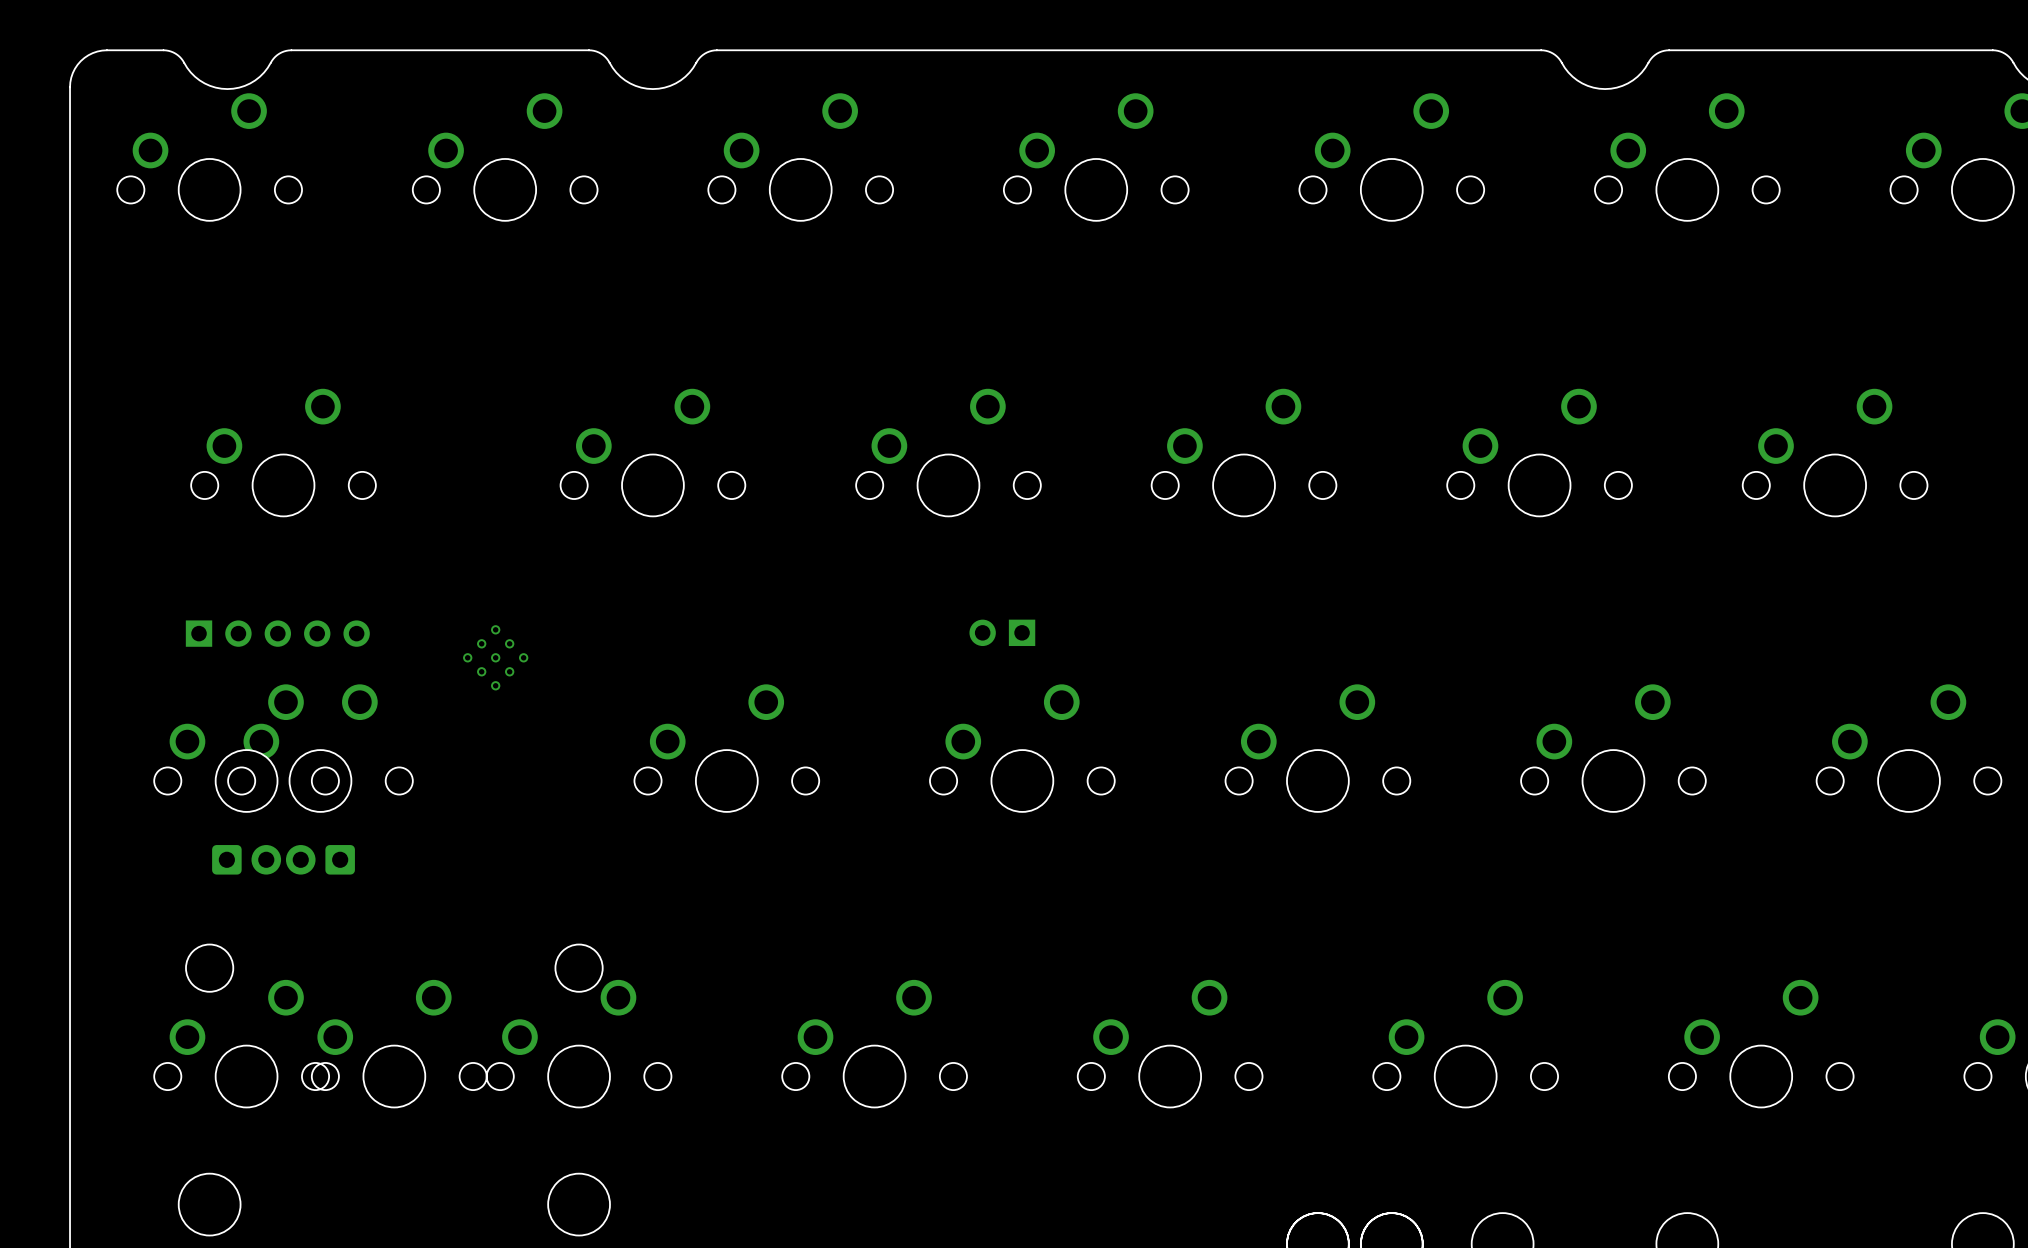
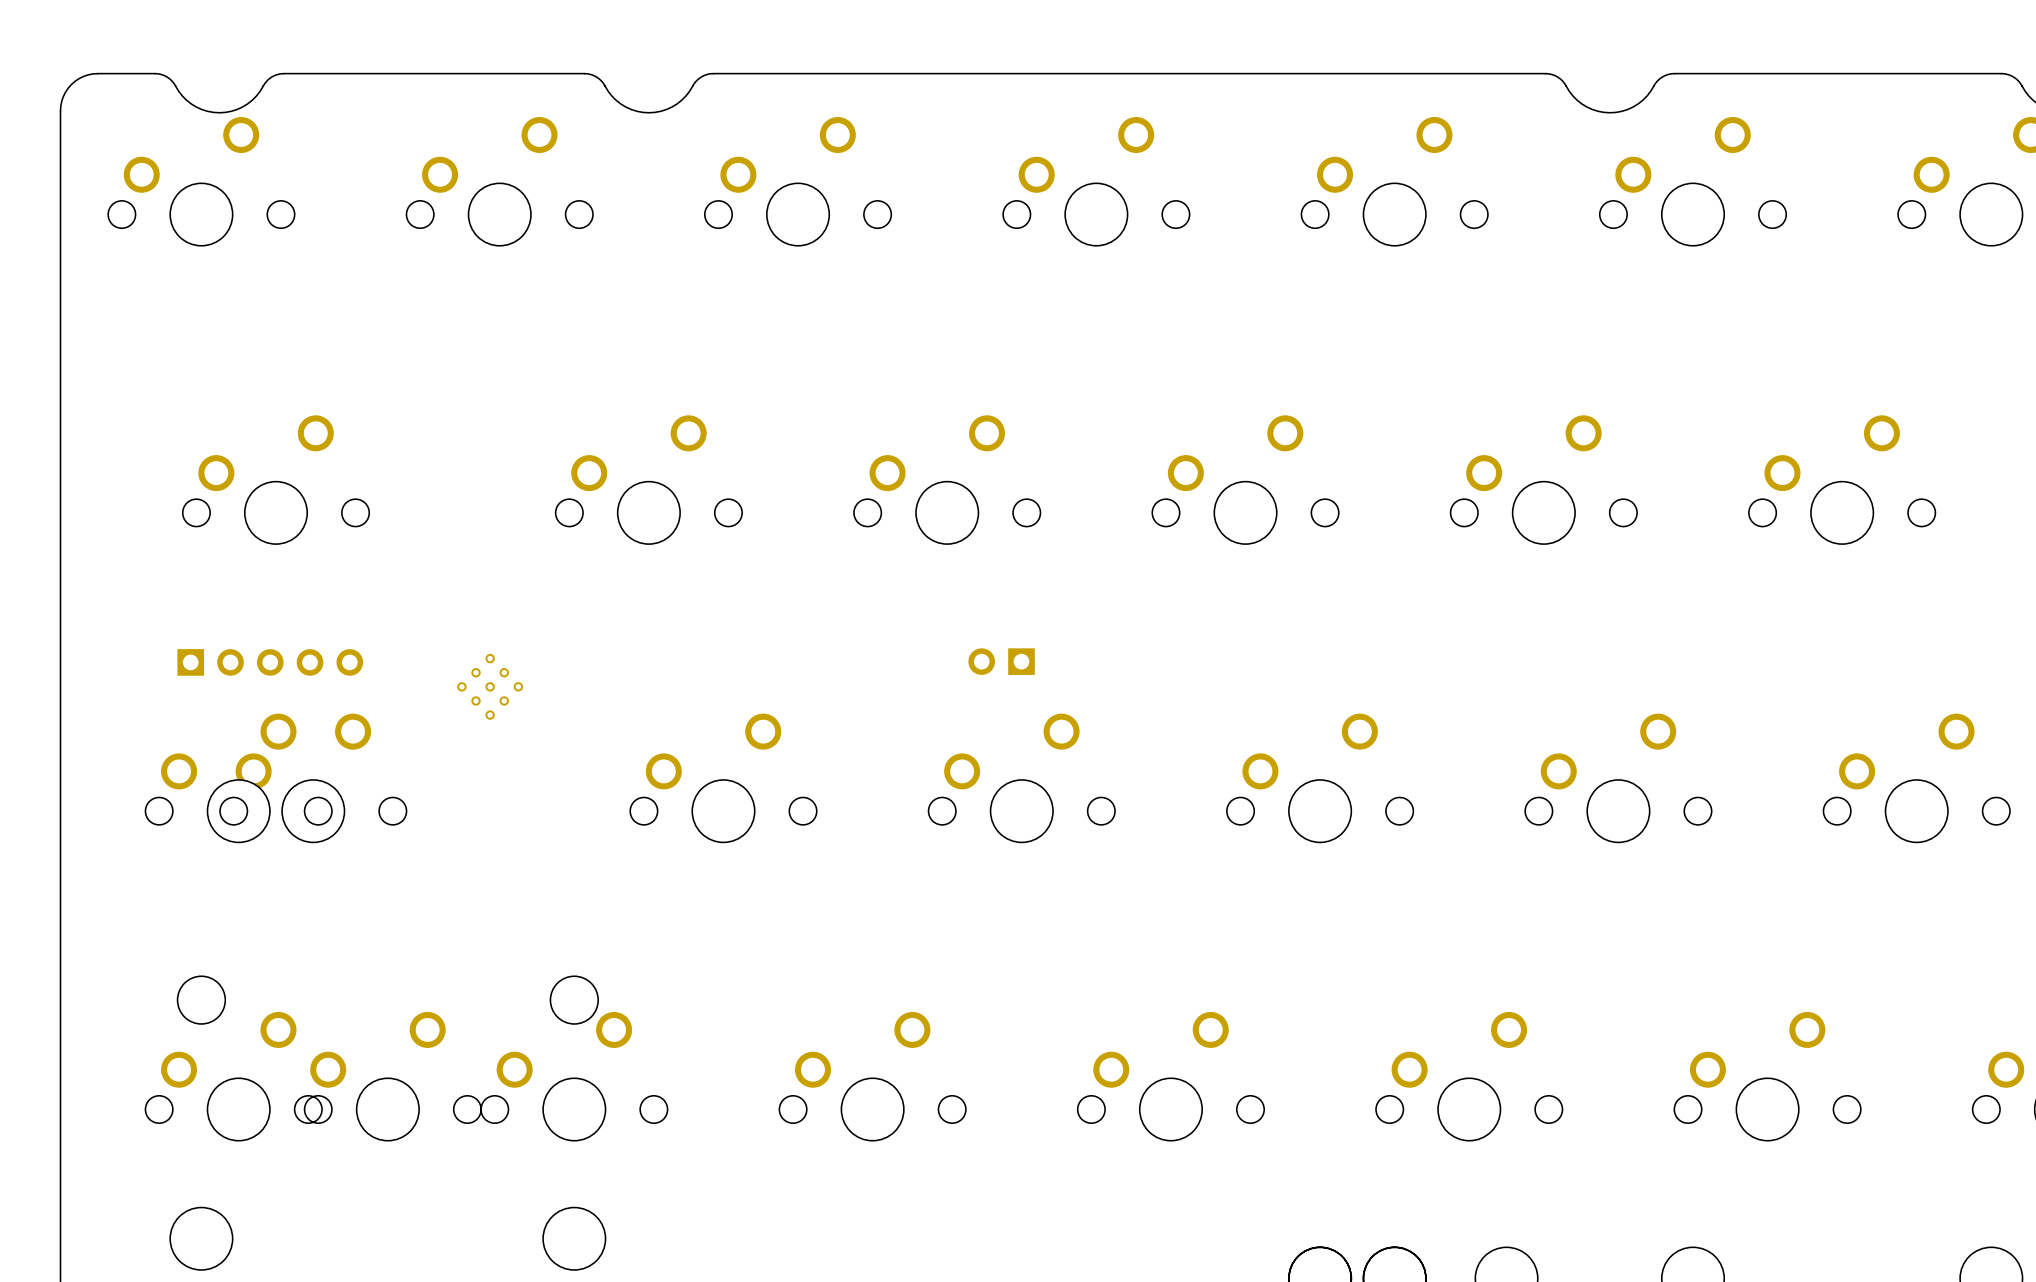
part: (246, 859) -> none
part: (320, 859) -> none

